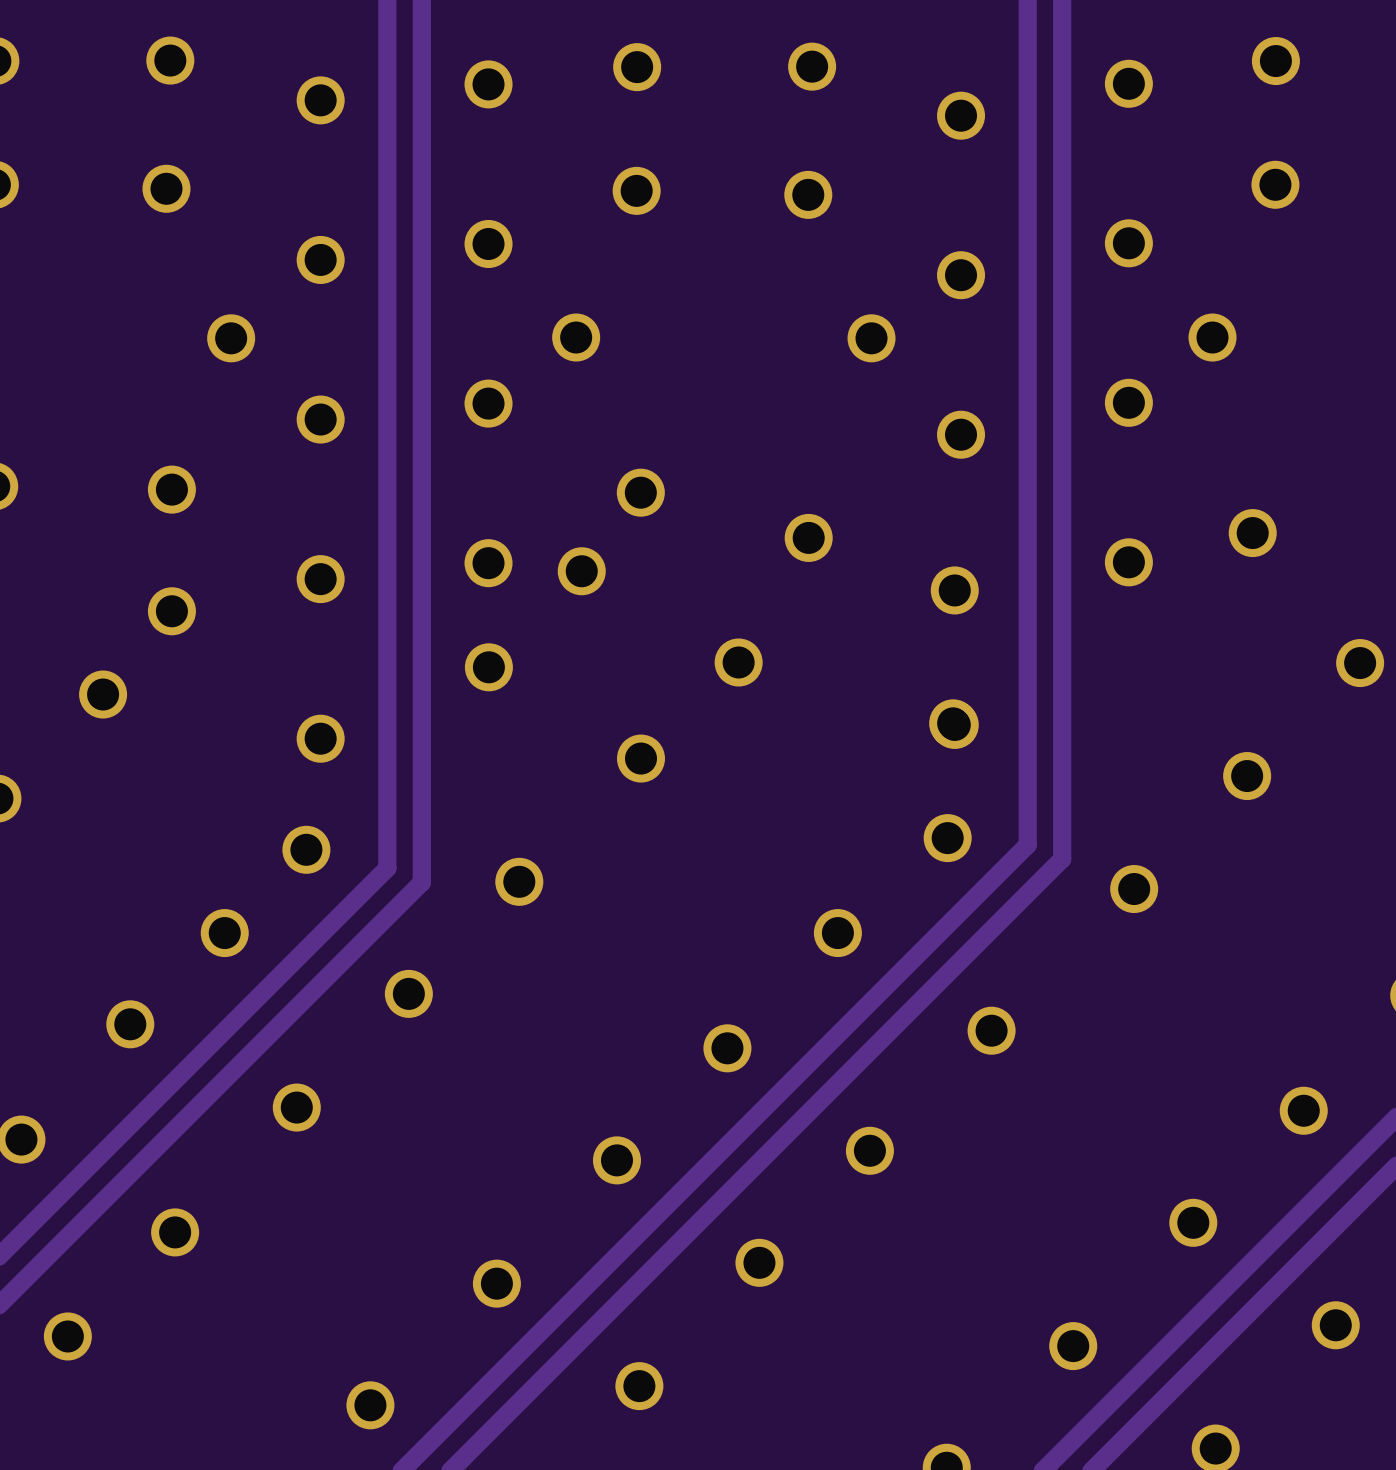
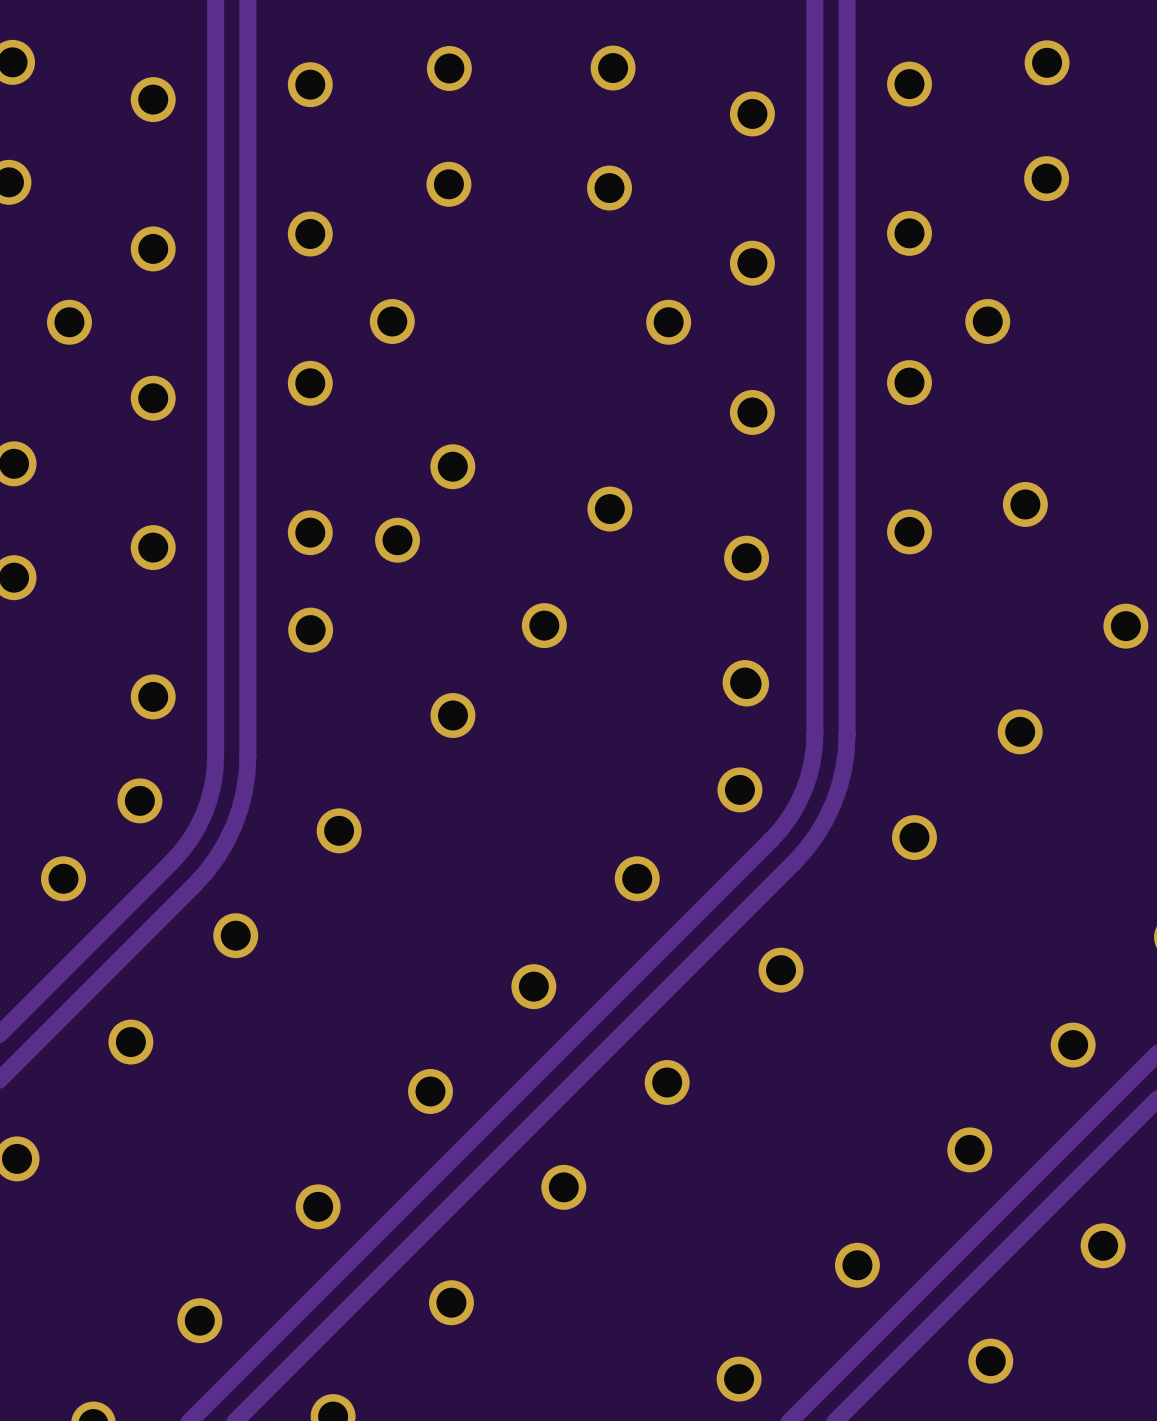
track: (1027, 778) (1027, 844) (980, 891) -> (814, 734) (811, 763) (803, 791) (789, 817) (770, 840)
track: (1062, 778) (1062, 859) (1005, 916) -> (847, 734) (843, 769) (833, 803) (816, 835) (793, 862)
track: (387, 801) (387, 868) (340, 915) -> (215, 756) (212, 785) (204, 813) (190, 839) (171, 861)
track: (421, 801) (421, 882) (364, 939) -> (247, 756) (244, 791) (234, 825) (217, 857) (194, 884)

